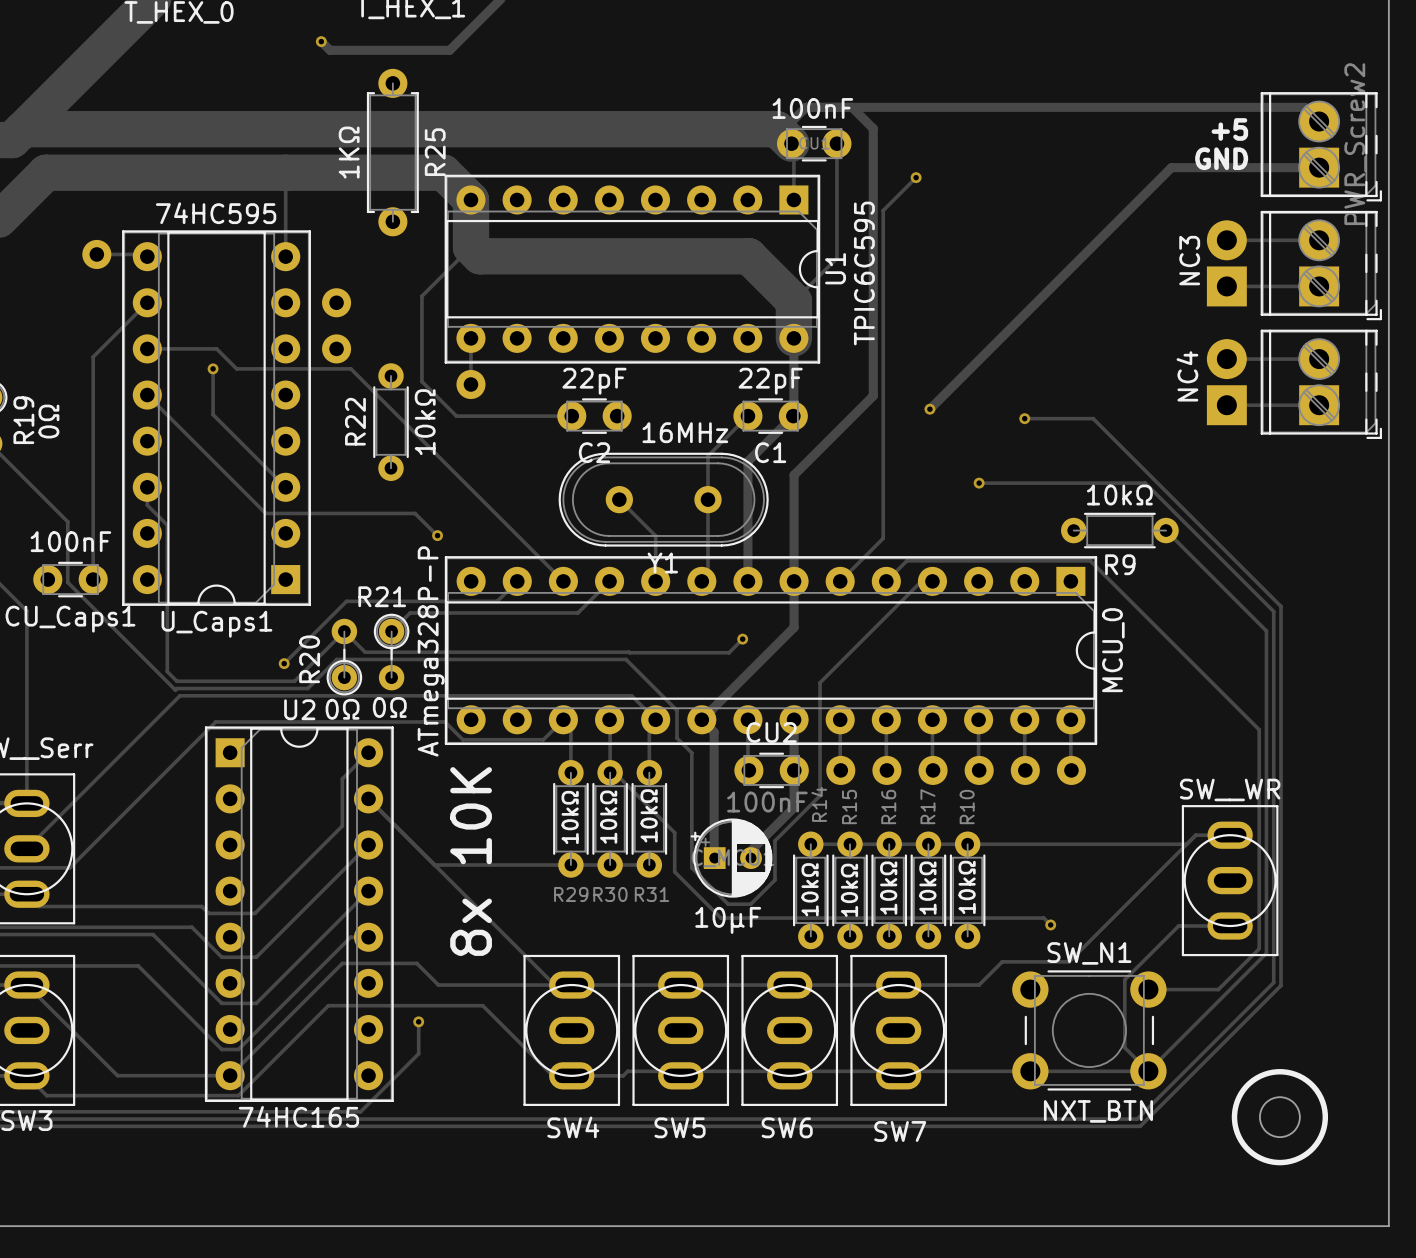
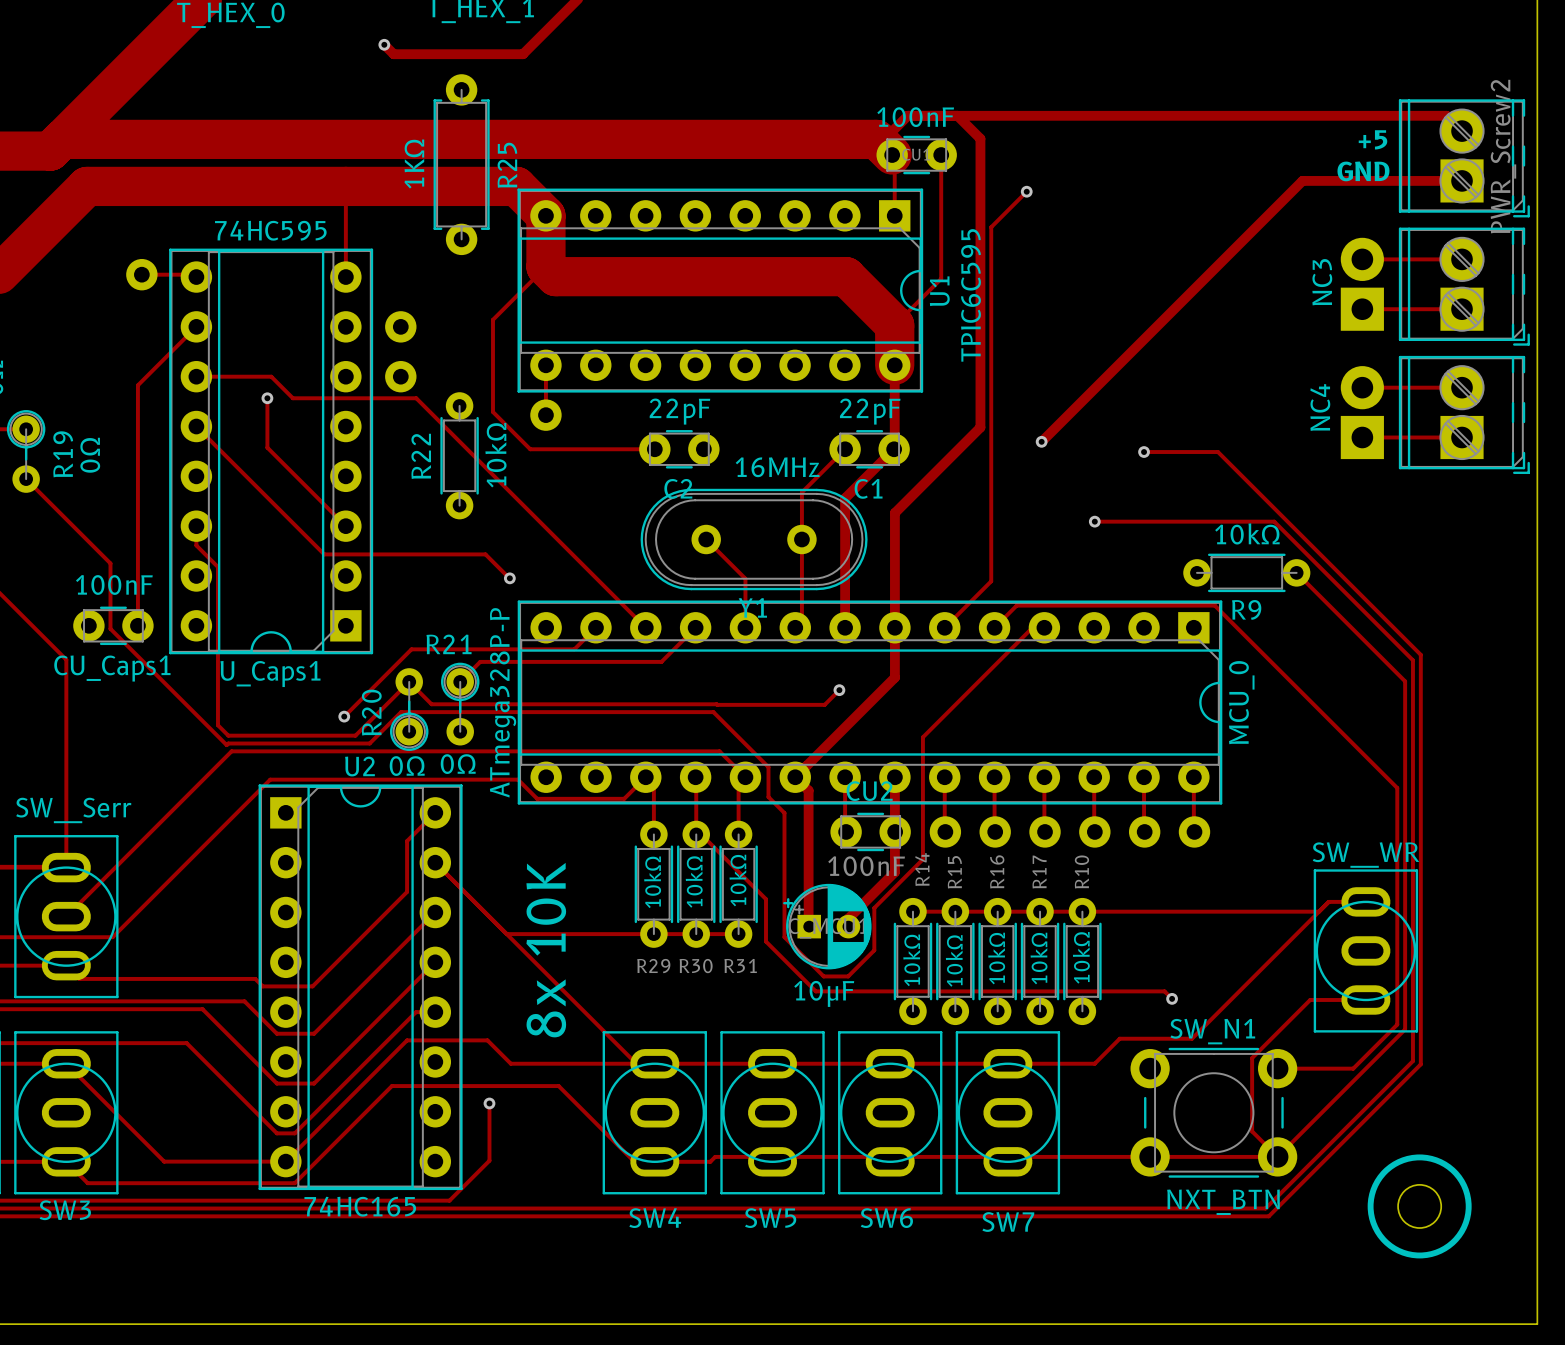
track: (418, 1053) (360, 1111) -> (489, 1137) (489, 1160) (449, 1200) (426, 1200)

